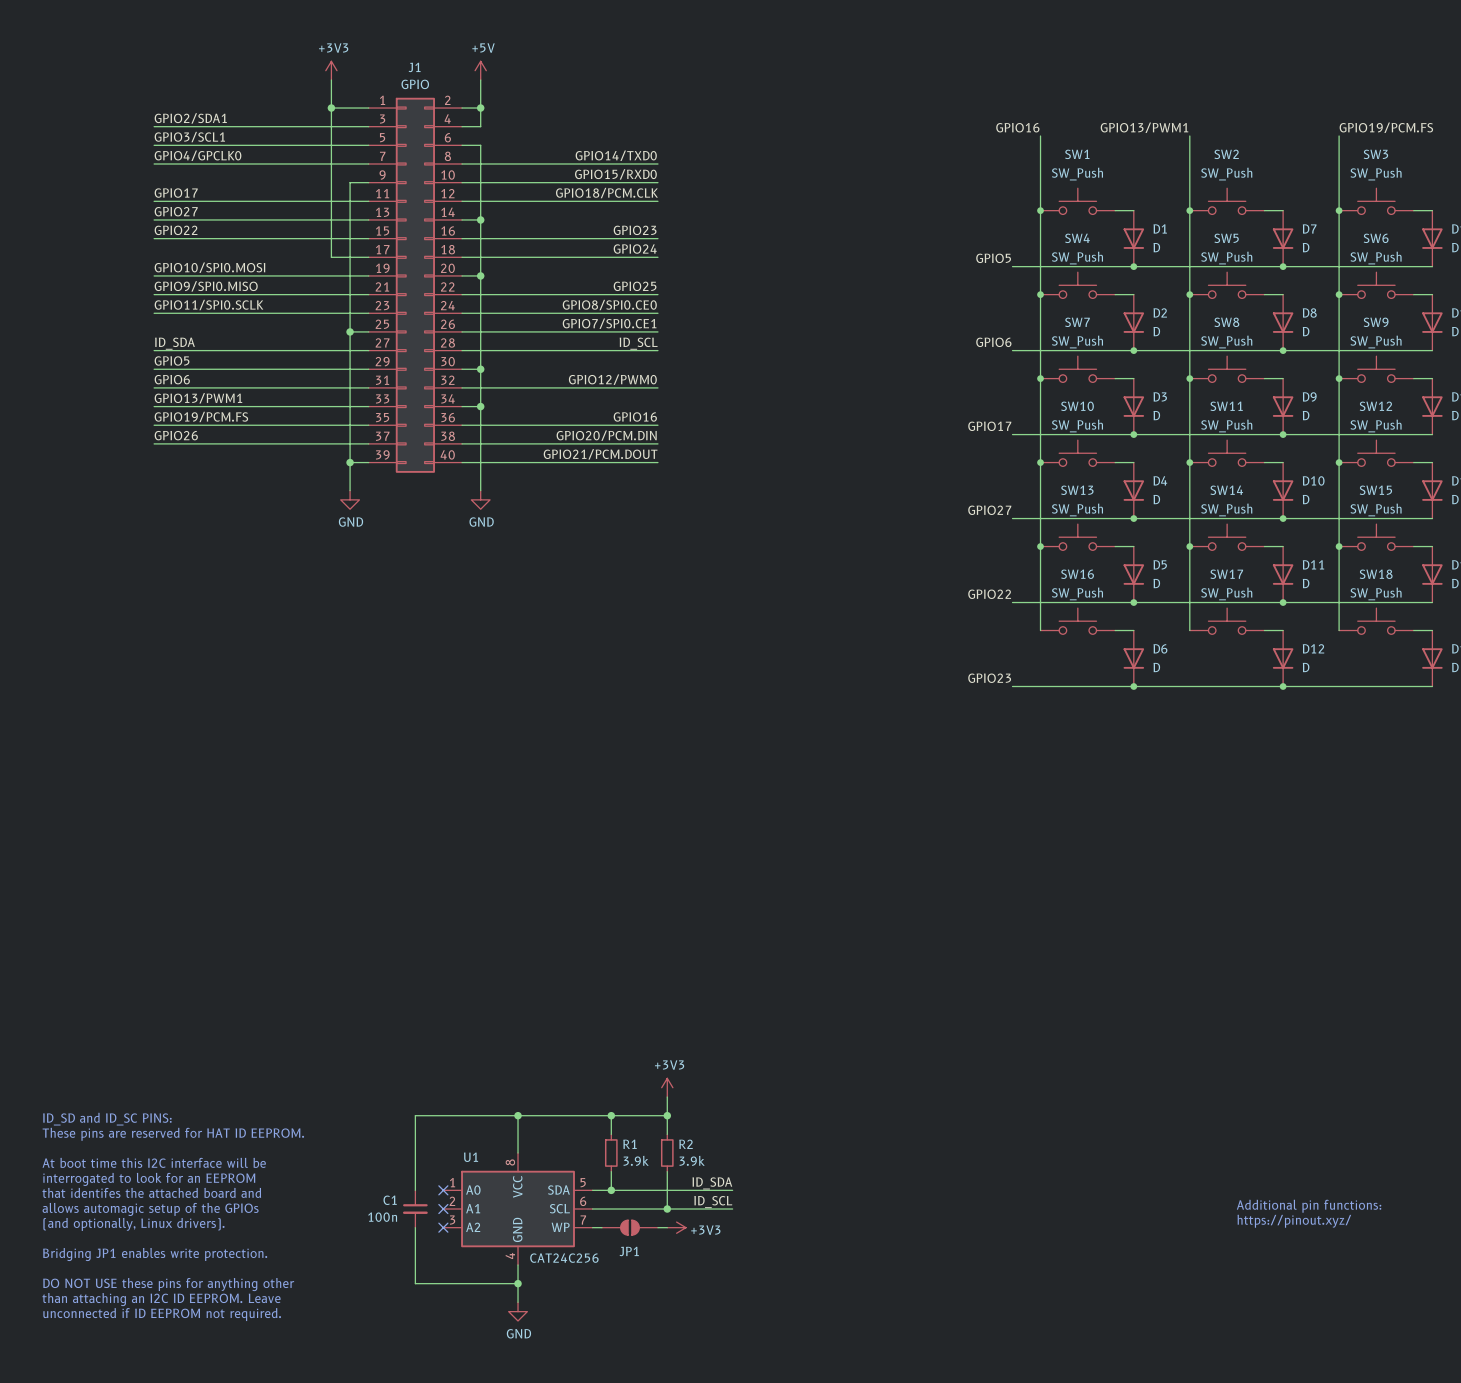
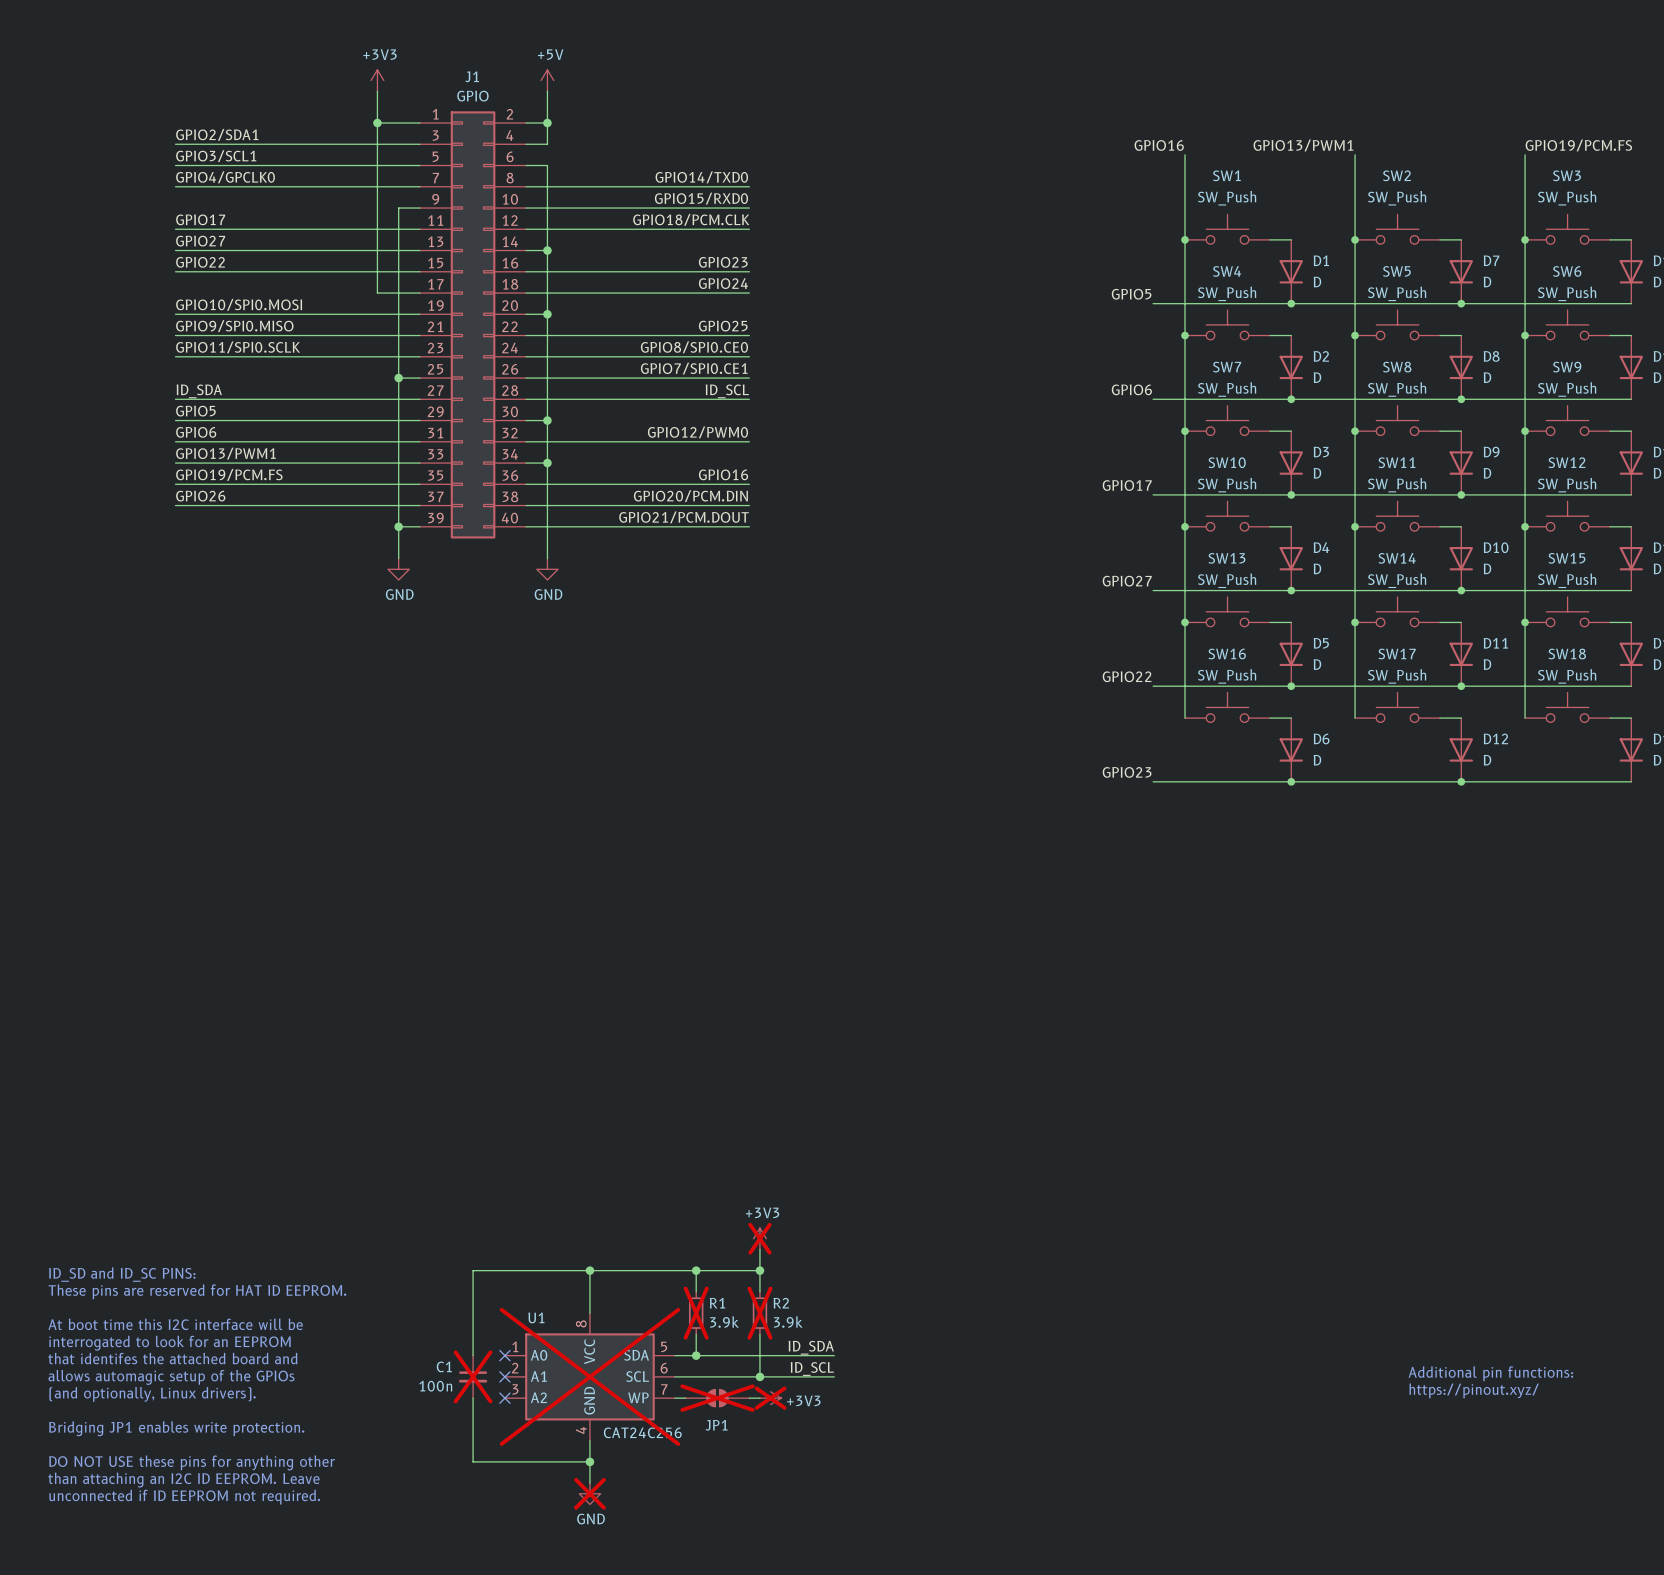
power symbol do-not-place cross: none -> (759, 1238)
R1 do-not-place cross: none -> (696, 1313)
R2 do-not-place cross: none -> (759, 1313)
C1 do-not-place cross: none -> (473, 1376)
U1 do-not-place cross: none -> (589, 1376)
JP1 do-not-place cross: none -> (717, 1398)
power symbol do-not-place cross: none -> (770, 1398)
power symbol do-not-place cross: none -> (589, 1493)

